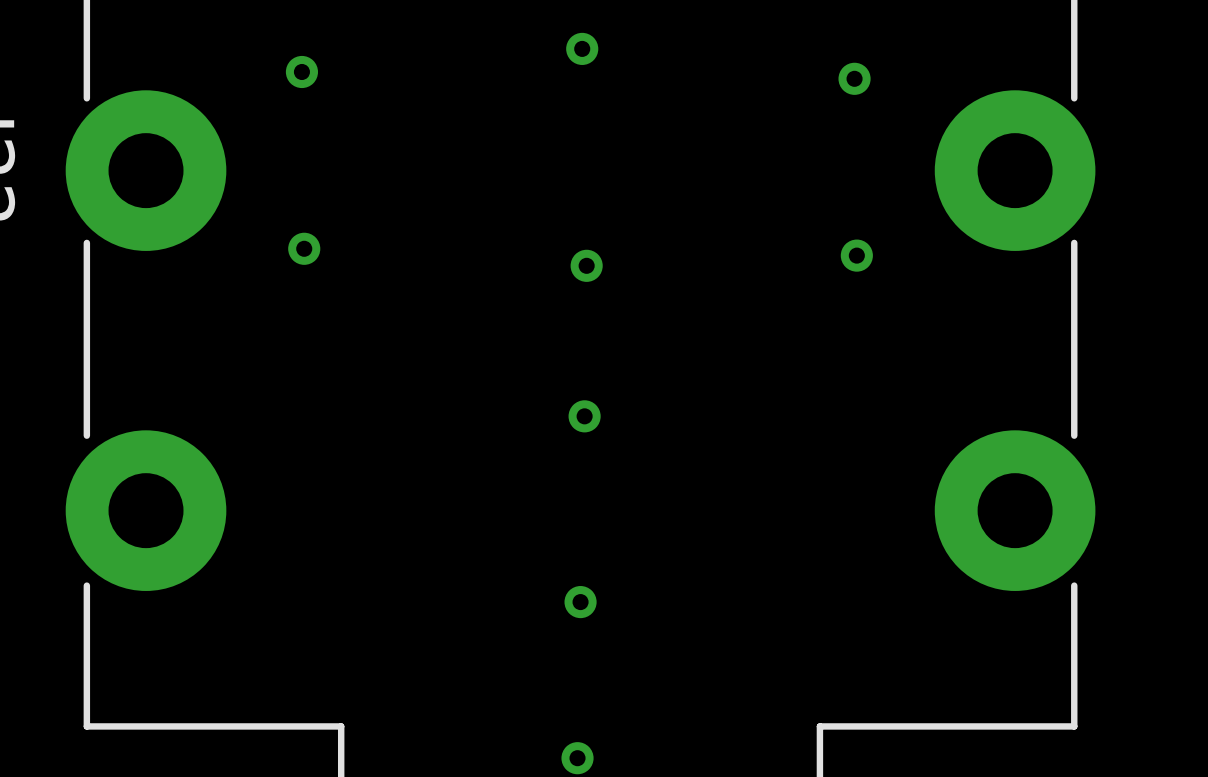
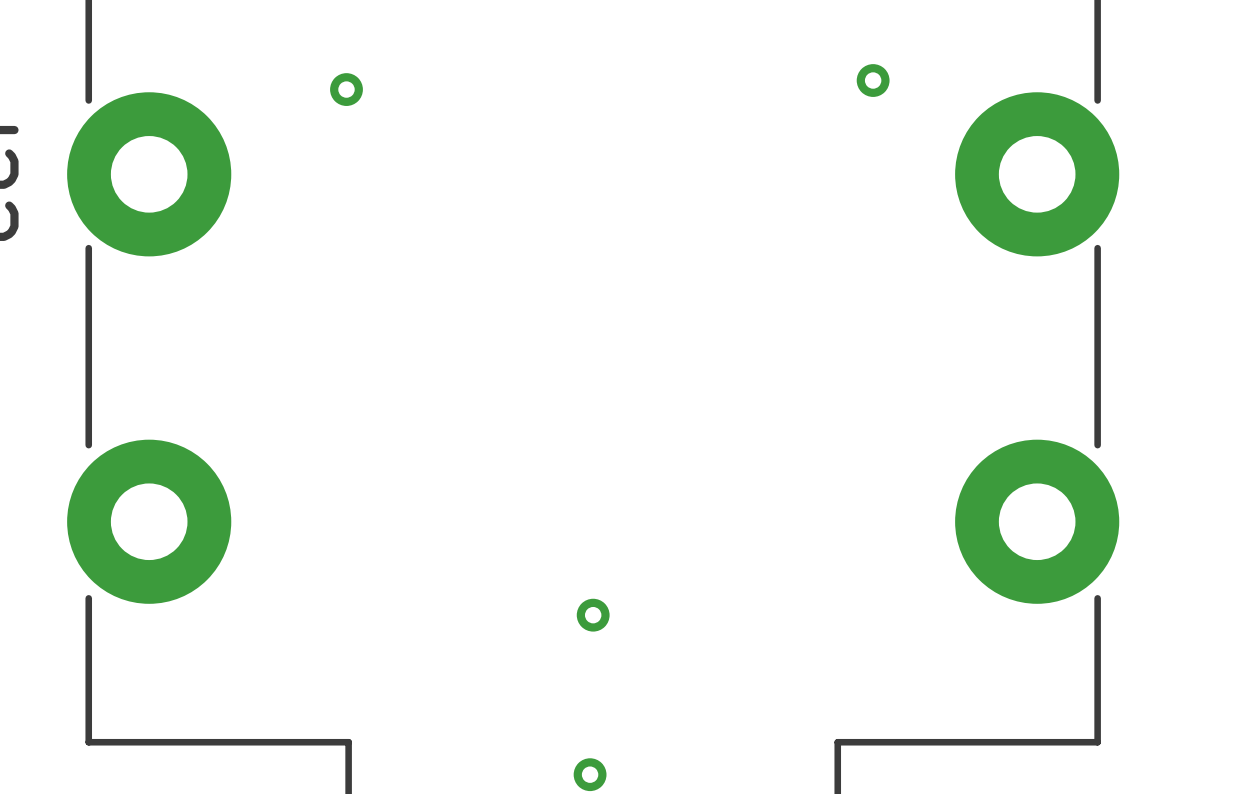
via: (582, 48) -> none
via position: (301, 71) -> (346, 89)
via: (304, 248) -> none
via: (856, 255) -> none
via: (586, 265) -> none
via: (584, 416) -> none

